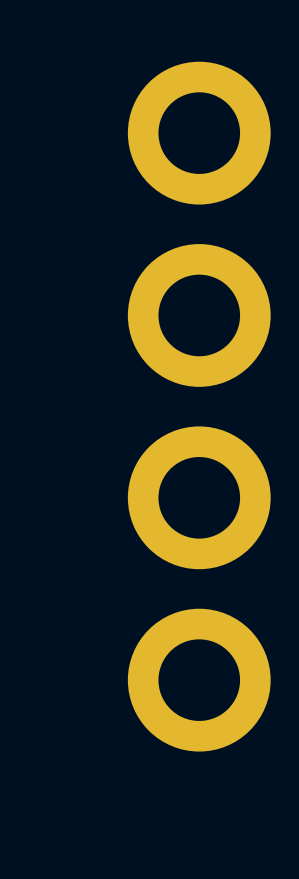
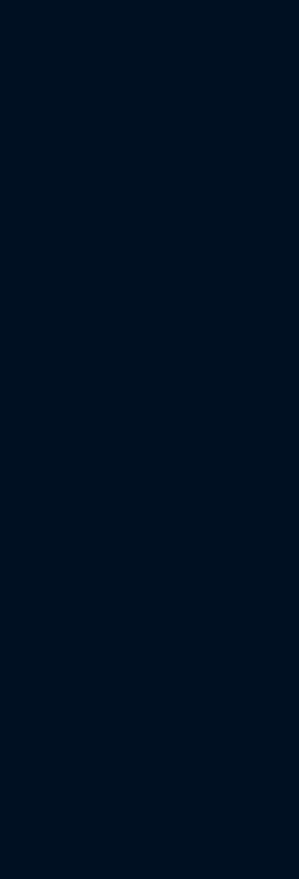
part: (199, 133) -> none
part: (199, 315) -> none
part: (199, 497) -> none
part: (199, 680) -> none

